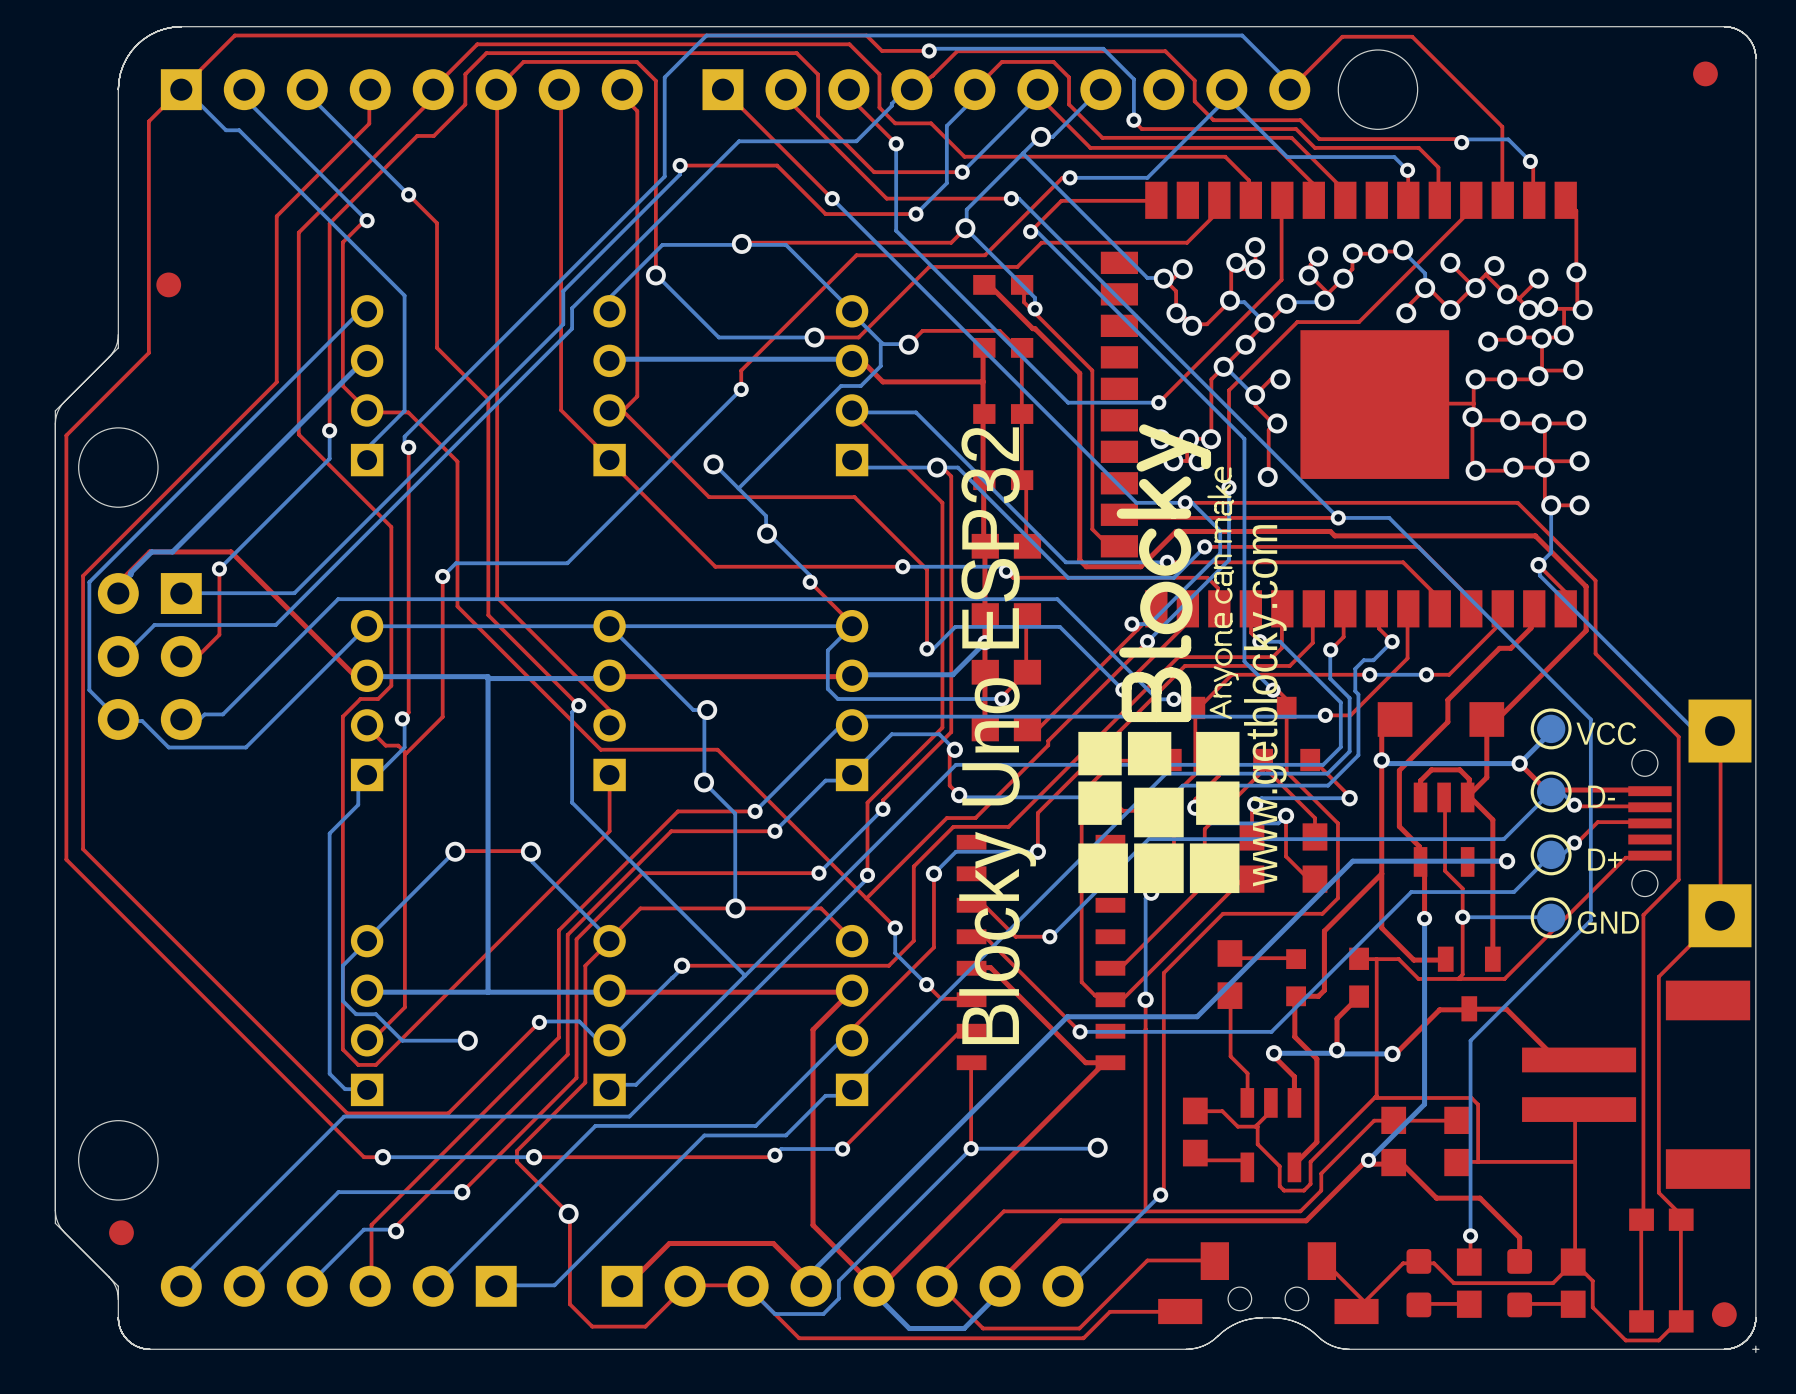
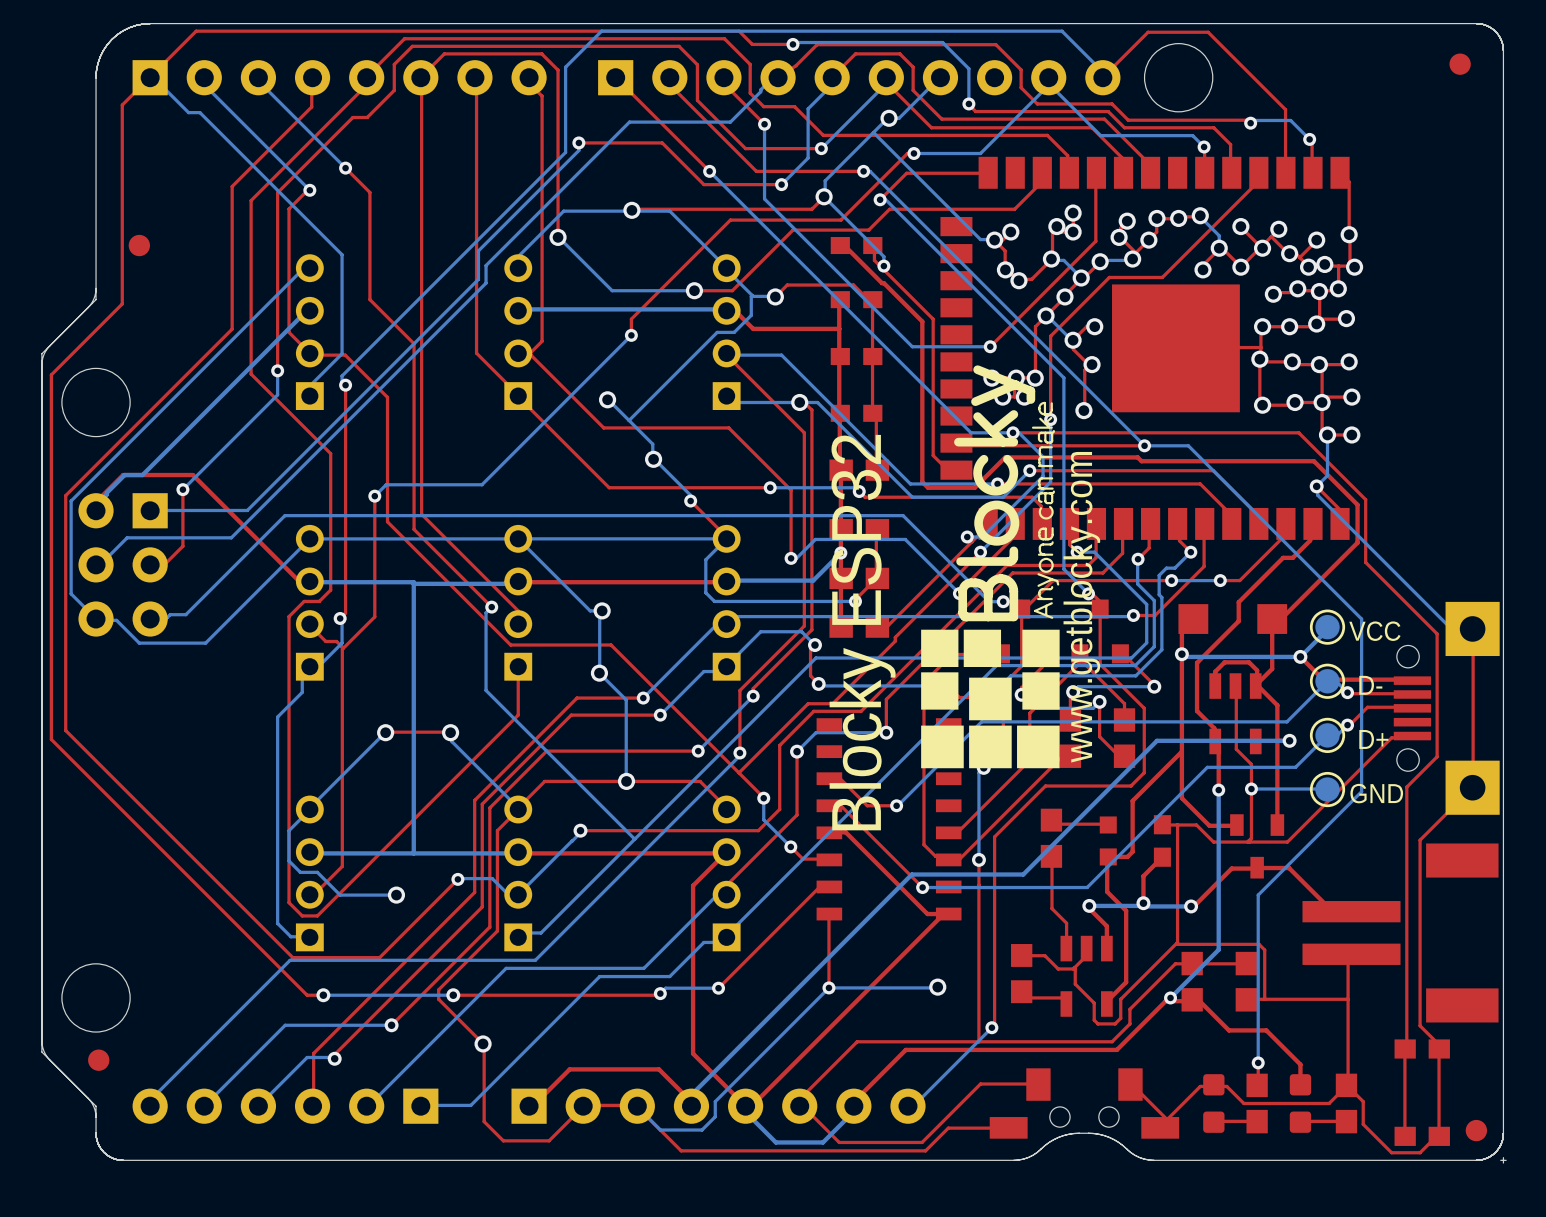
text: Blocky Uno ESP32 (997, 735) -> Blocky ESP32 (862, 632)

